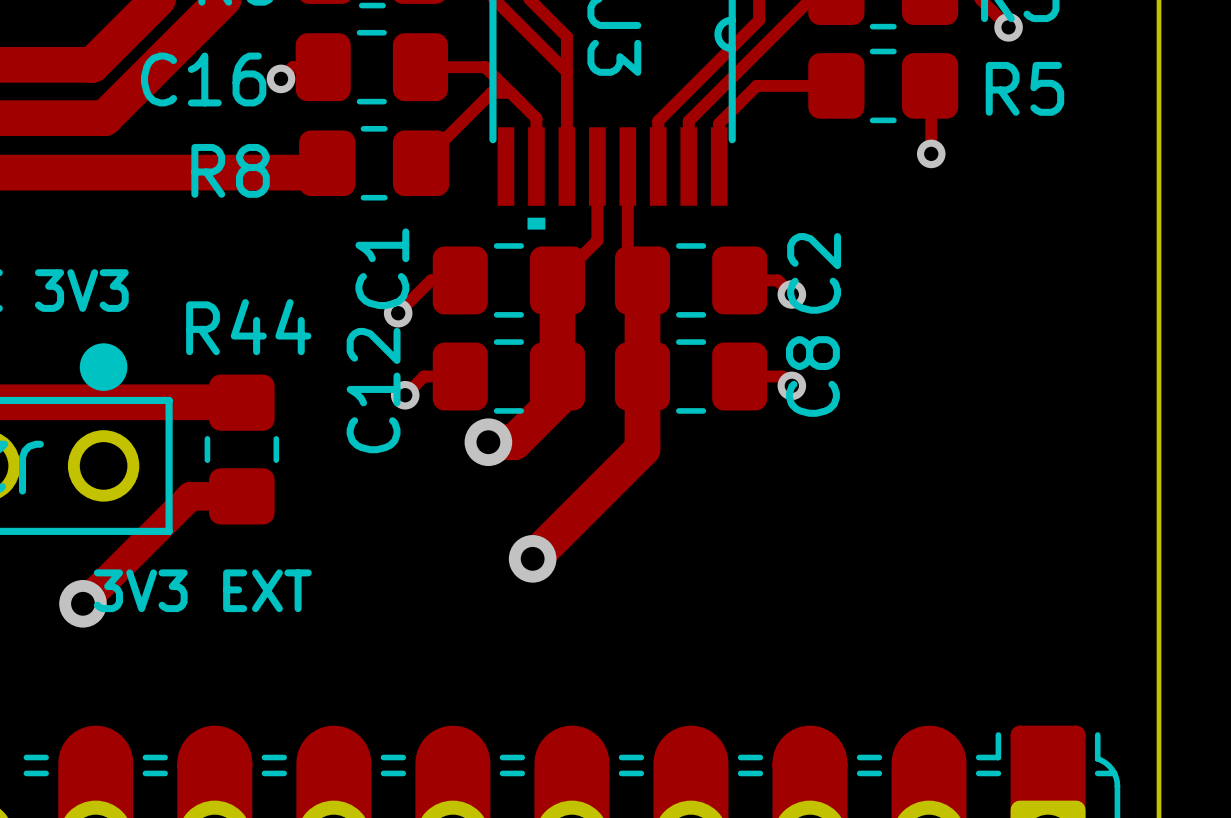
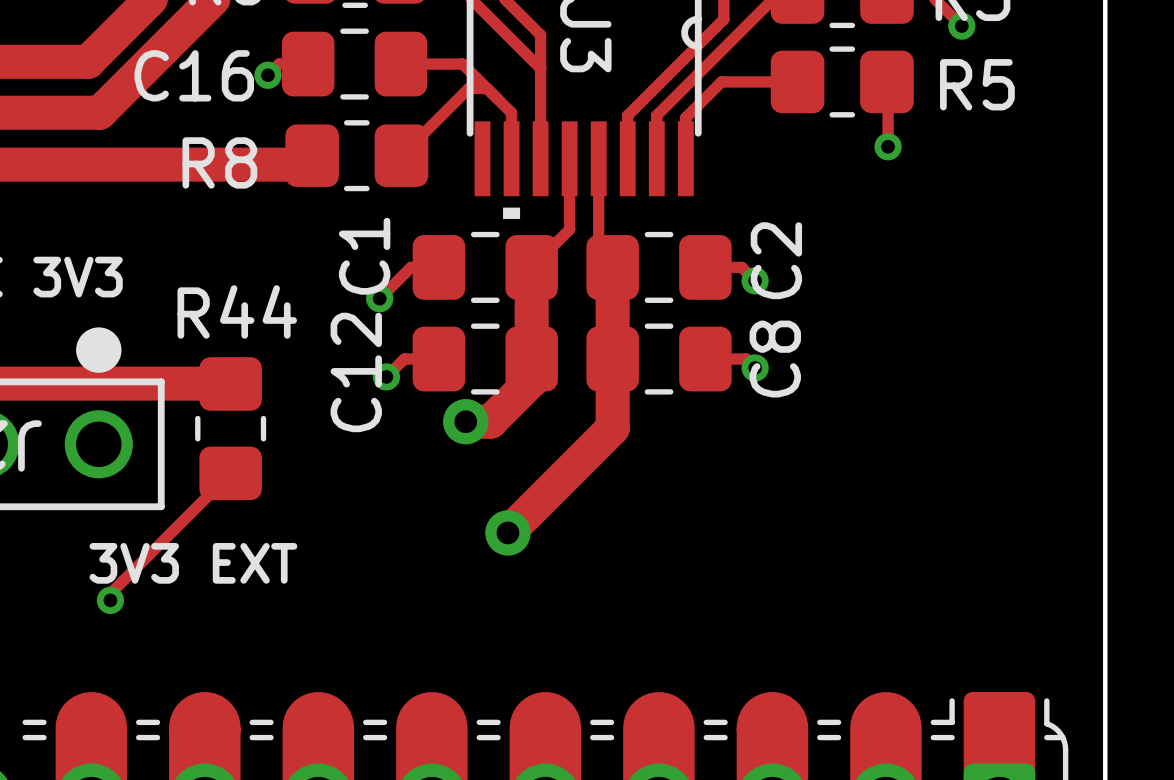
track: (241, 496) (190, 496) (82, 603) -> (230, 473) (110, 593) (110, 600)
via position: (82, 603) -> (110, 600)

